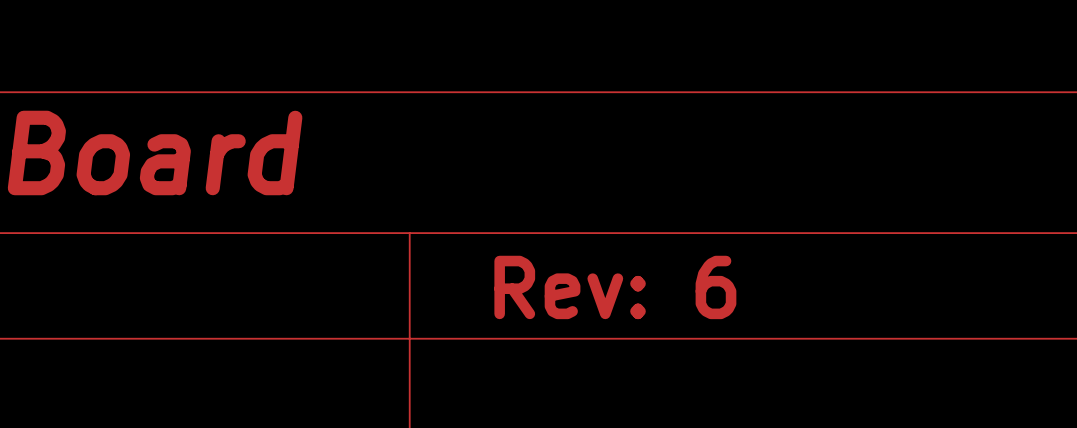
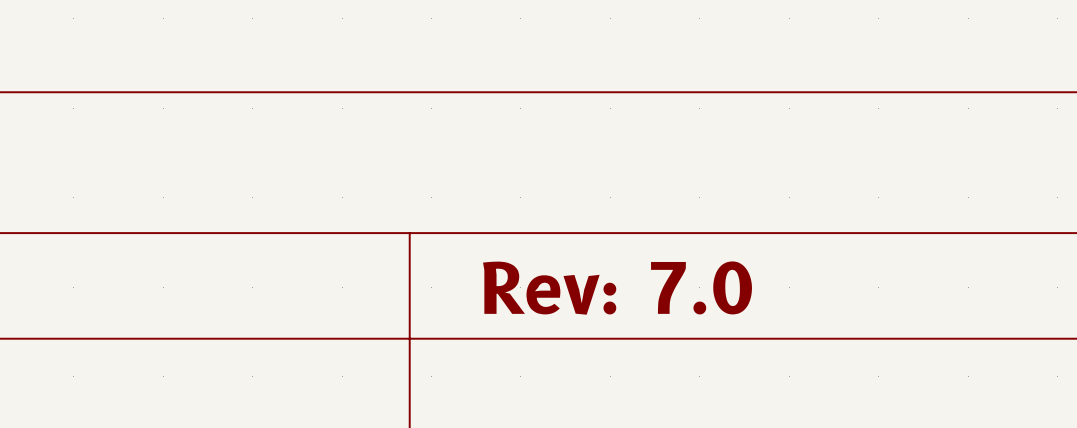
title block: Rev: 6 (615, 287) -> Rev: 7.0 (617, 288)

